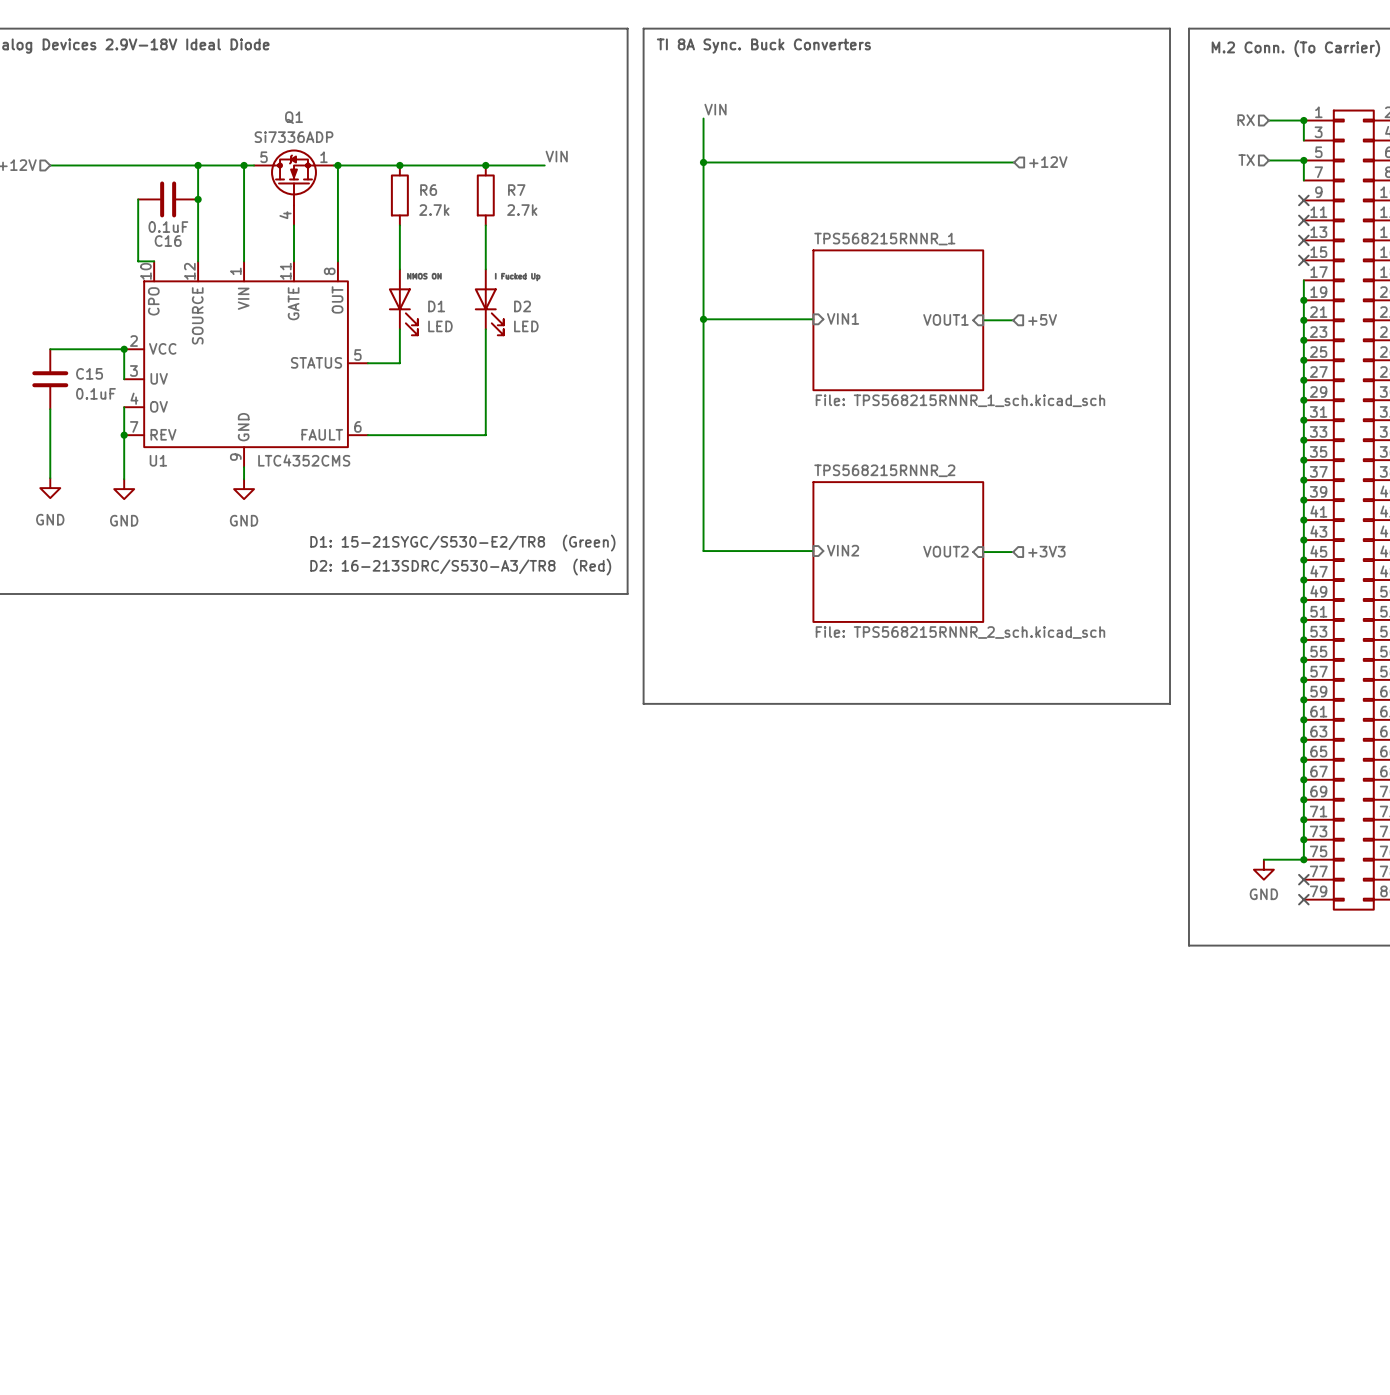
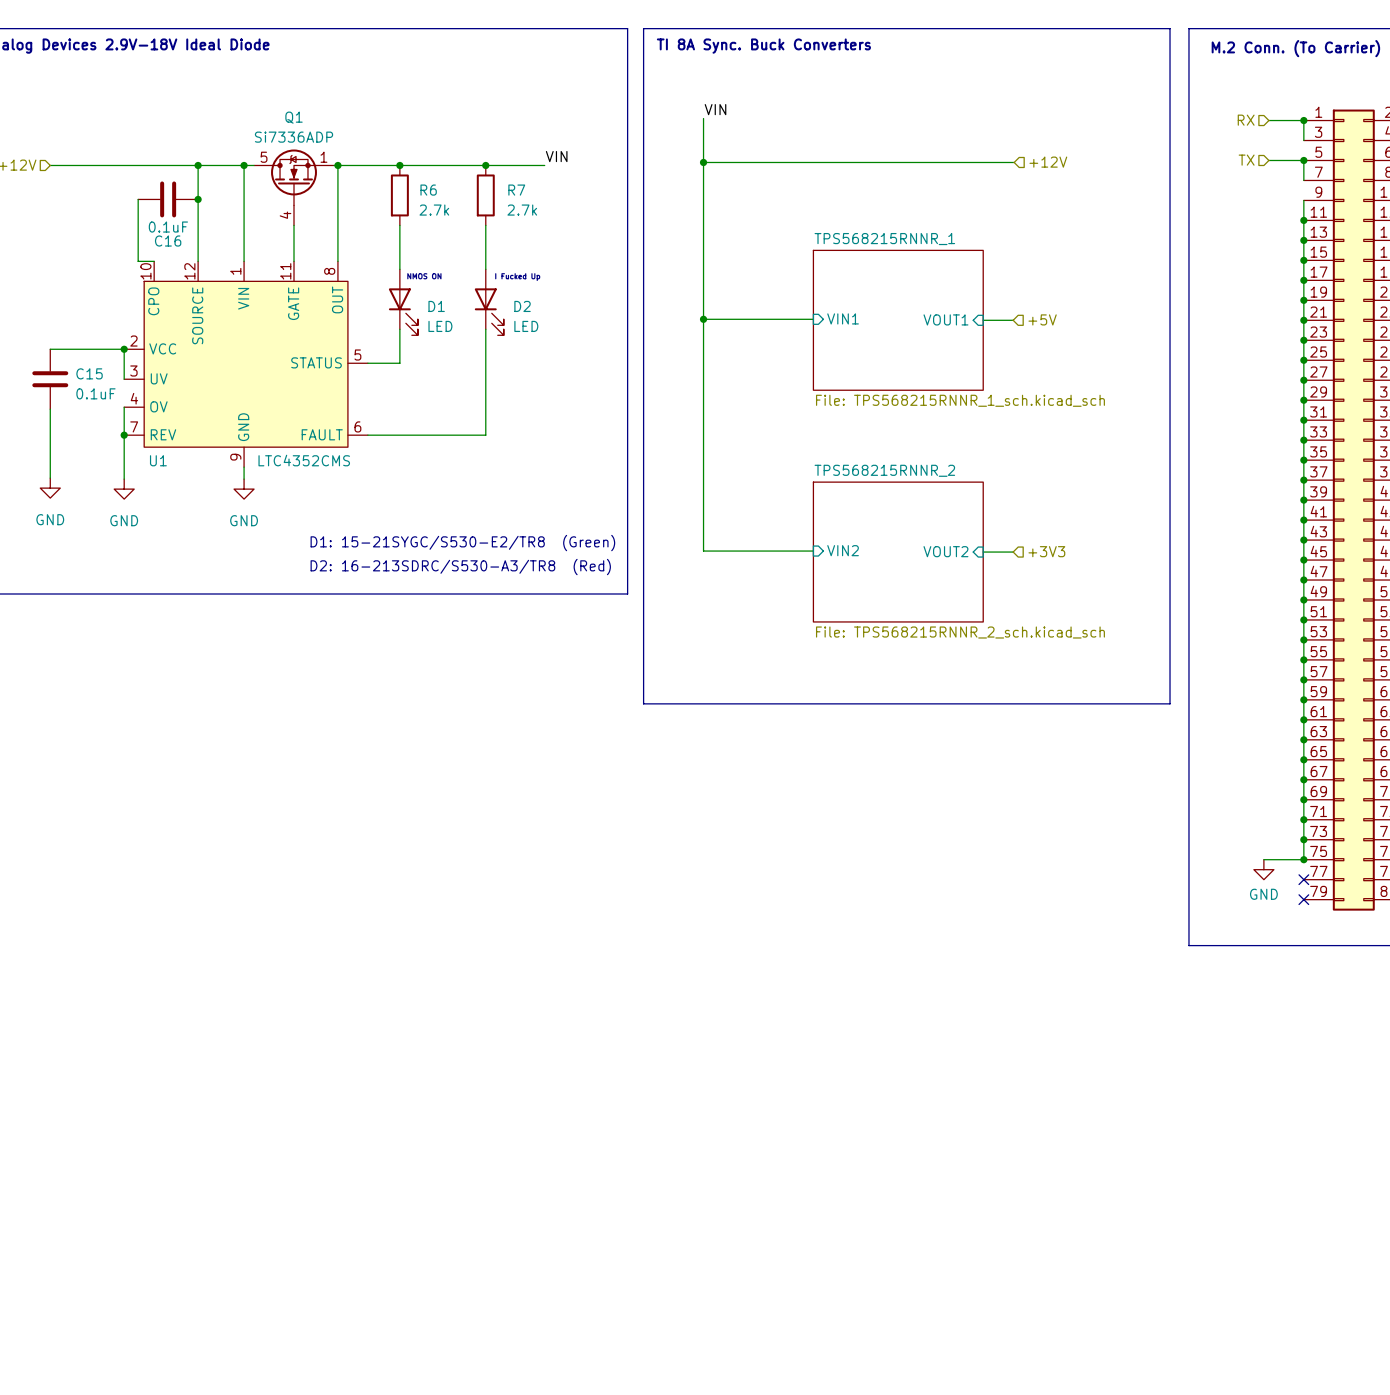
wire: none -> (1303, 200) (1303, 280)
no-connect mark: (1303, 200) -> none
no-connect mark: (1303, 220) -> none
junction: none -> (1303, 220)
no-connect mark: (1303, 240) -> none
junction: none -> (1303, 240)
no-connect mark: (1303, 260) -> none
junction: none -> (1303, 260)
junction: none -> (1303, 280)

